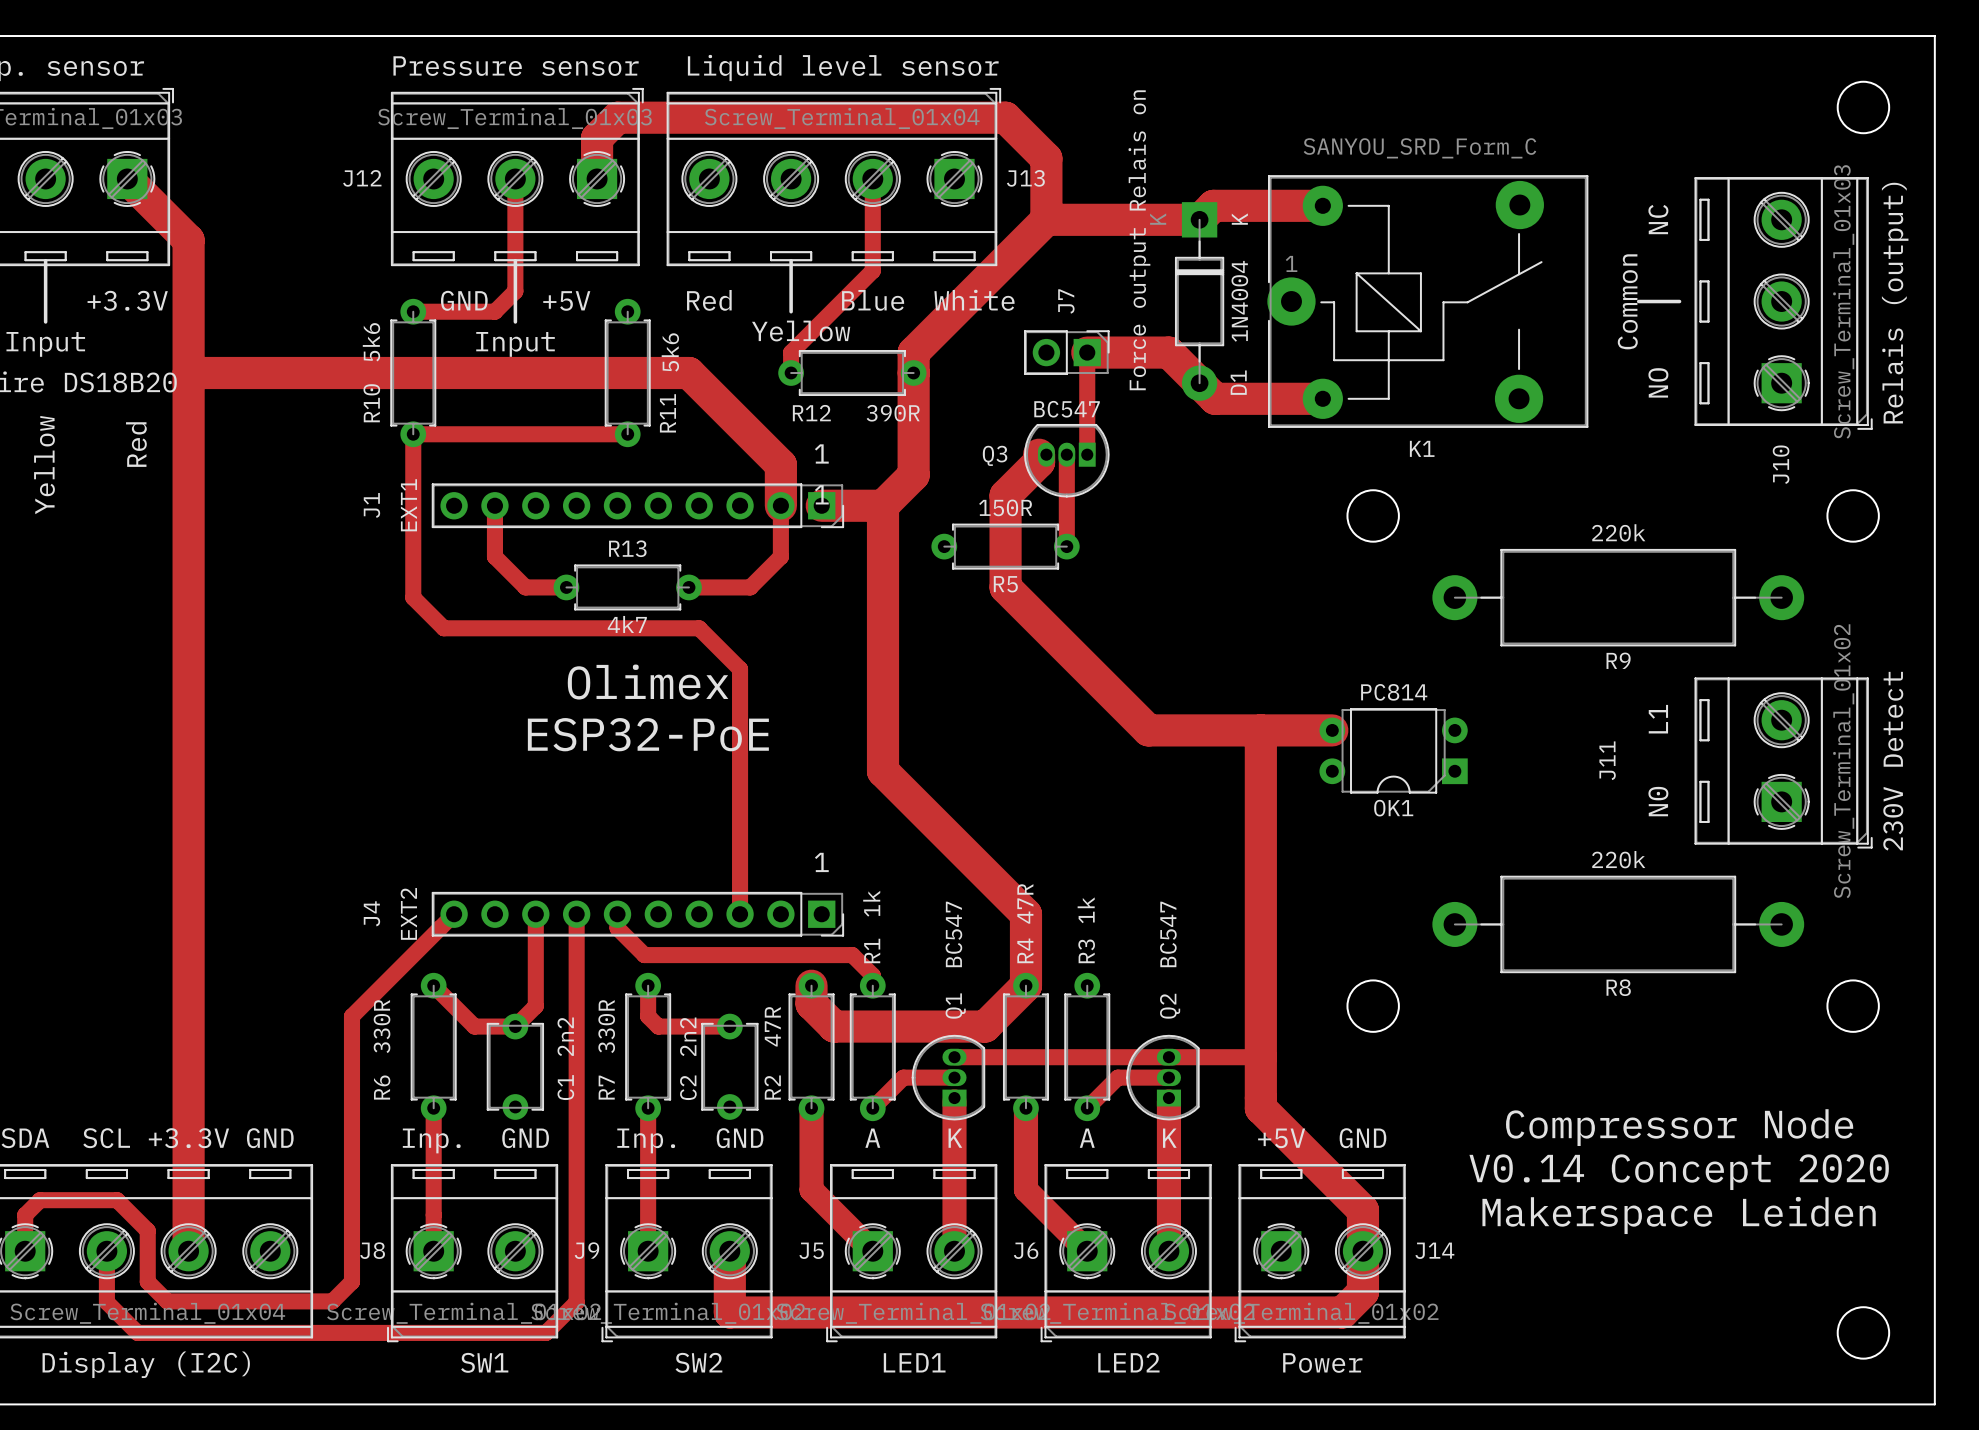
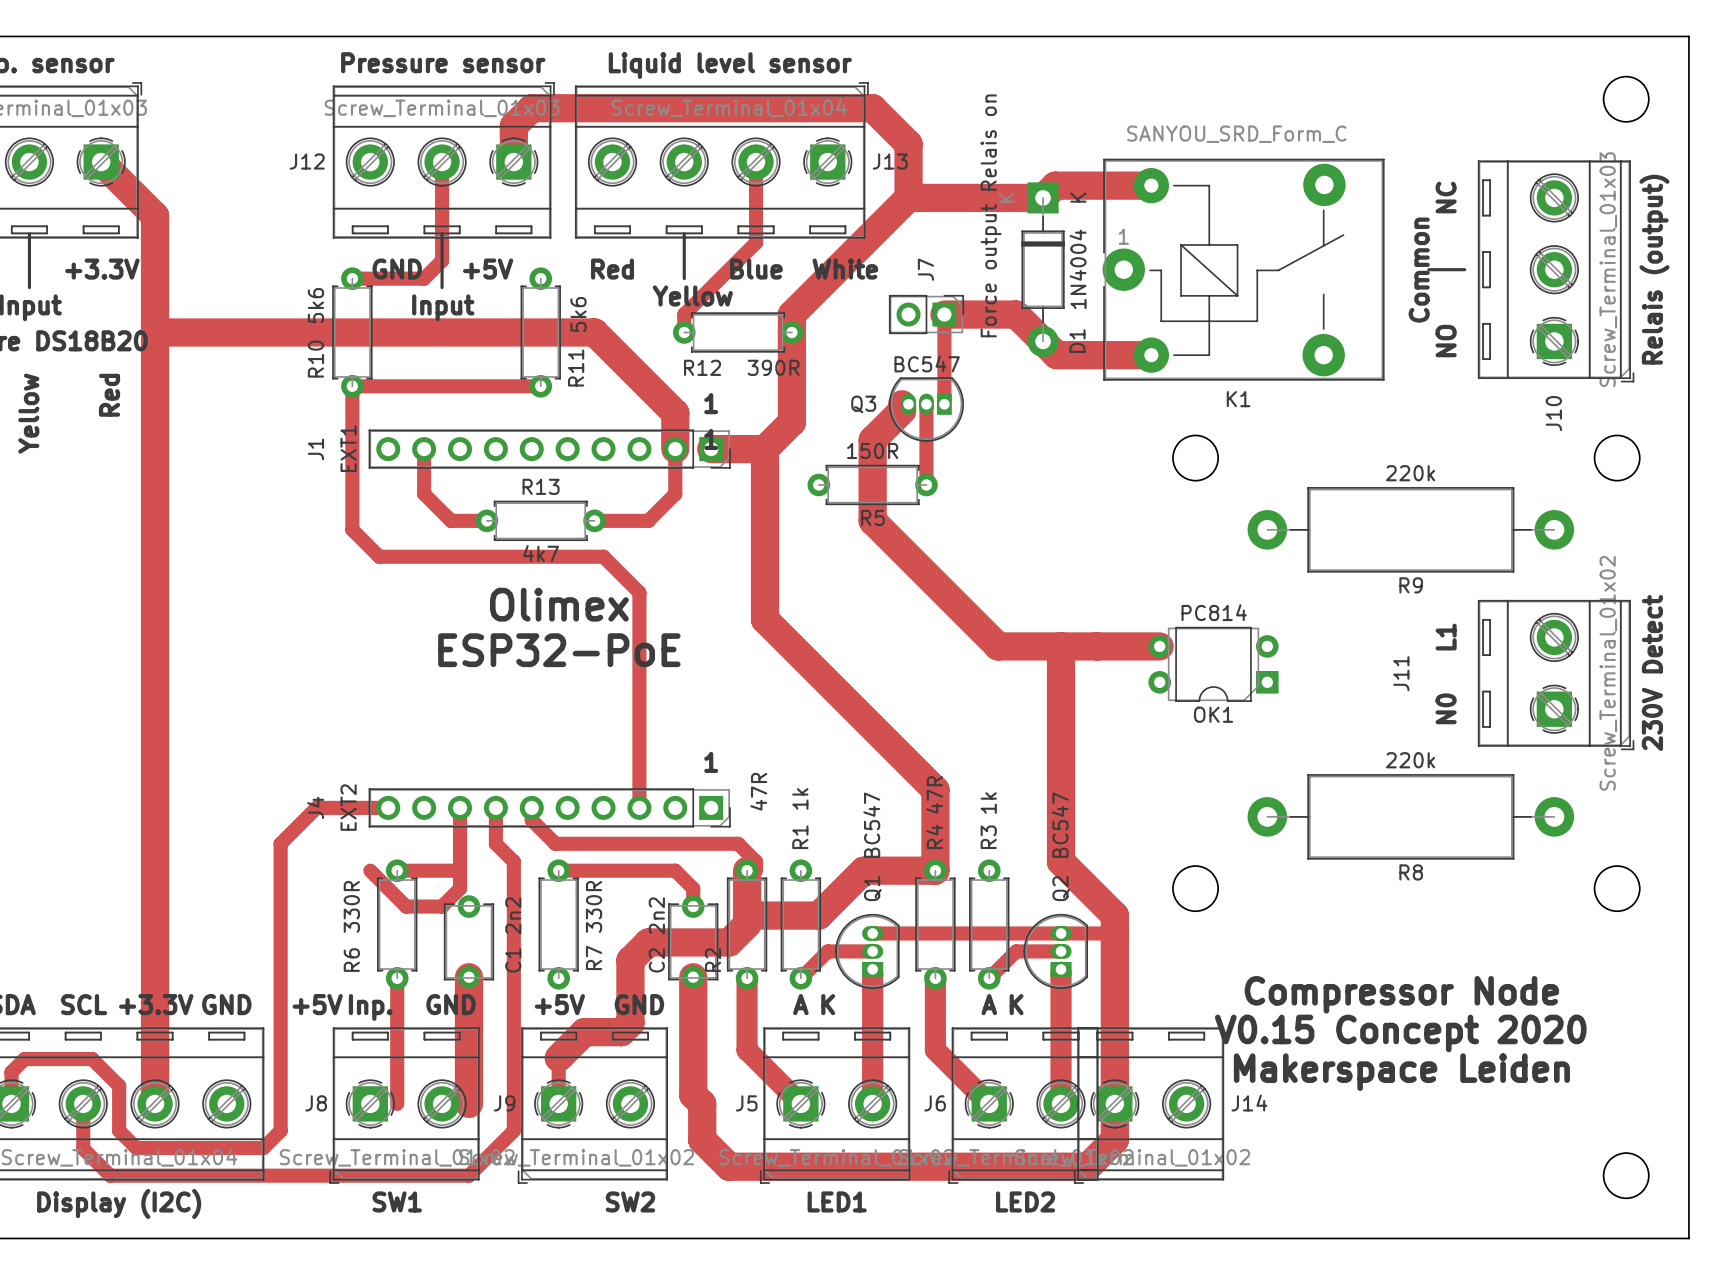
track: (883, 699) (883, 771) (1025, 914) (1025, 985) (985, 1026) (834, 1026) (811, 1003) (811, 985) -> (765, 619) (935, 789) (935, 870) (863, 870) (818, 915) (756, 915) (747, 906)
track: none -> (1061, 646) (1061, 861) (1114, 915) (1114, 1139) (1087, 1166) (729, 1166) (702, 1139) (702, 1103) (693, 1094) (693, 977)
track: (1260, 730) (1260, 1108) (1362, 1210) (1362, 1292) (1342, 1312) (729, 1312) (729, 1251) -> none
track: (454, 914) (351, 1016) (351, 1281) (332, 1301) (312, 1301) -> (388, 807) (316, 807) (280, 843) (280, 1130) (263, 1147)
track: (576, 955) (576, 1302) -> (495, 843) (513, 861) (513, 1130) (495, 1148)
track: none -> (397, 870) (460, 870)
track: (648, 985) (648, 1016) (658, 1026) (729, 1026) -> (558, 870) (675, 870) (693, 888) (693, 906)
R7 value position: 330R (606, 1026) -> 330R (594, 906)
R2 value position: 47R (772, 1026) -> 47R (758, 791)
R6 position: (433, 1046) -> (397, 924)
R2 position: (811, 1046) -> (747, 924)
R1 position: (872, 1046) -> (800, 924)
R4 position: (1025, 1046) -> (935, 924)
R3 position: (1087, 1046) -> (989, 924)
track: (954, 1057) (1005, 1057) -> none
C1 position: (515, 1066) -> (468, 941)
C2 position: (729, 1066) -> (693, 941)
Q1 position: (948, 1077) -> (867, 951)
track: (954, 1077) (903, 1077) (872, 1108) -> (872, 951) (827, 951) (800, 978)
Q2 position: (1162, 1077) -> (1055, 951)
track: (1168, 1077) (1117, 1077) (1087, 1108) -> (1061, 951) (1016, 951) (989, 978)
R7 name position: R7 (606, 1087) -> R7 (594, 957)
track: (954, 1101) (954, 1251) -> (872, 972) (872, 1103)
track: (1168, 1101) (1168, 1251) -> (1061, 972) (1061, 1103)
track: none -> (468, 977) (468, 1103)
track: (433, 1108) (433, 1251) -> (397, 978) (397, 1103)
track: (648, 1108) (648, 1198) -> (747, 870) (747, 924) (729, 942) (648, 942) (630, 960) (630, 1023) (621, 1032) (584, 1032) (558, 1058)
track: (811, 1108) (811, 1189) (872, 1251) -> (747, 978) (747, 1050) (800, 1103)
track: (1025, 1108) (1025, 1189) (1087, 1251) -> (935, 978) (935, 1050) (989, 1103)
text position: Compressor Node (1679, 1127) -> Compressor Node (1401, 994)
text: none -> +5V (317, 1004)
text position: A (872, 1138) -> A (800, 1004)
text position: A (1087, 1138) -> A (989, 1004)
text: +5V (1281, 1138) -> none
text: GND (1362, 1138) -> none
text: Inp. (646, 1140) -> +5V (559, 1004)
text: V0.14 Concept 2020 (1679, 1172) -> V0.15 Concept 2020 (1400, 1033)
text position: Makerspace Leiden (1679, 1215) -> Makerspace Leiden (1401, 1072)
J5 position: (911, 1253) -> (835, 1105)
J6 position: (1126, 1253) -> (1023, 1105)
text position: SW1 (484, 1362) -> SW1 (397, 1201)
text position: SW2 (698, 1362) -> SW2 (630, 1201)
text position: LED1 (914, 1362) -> LED1 (837, 1201)
text position: LED2 (1128, 1362) -> LED2 (1025, 1201)
text: Power (1322, 1363) -> none

